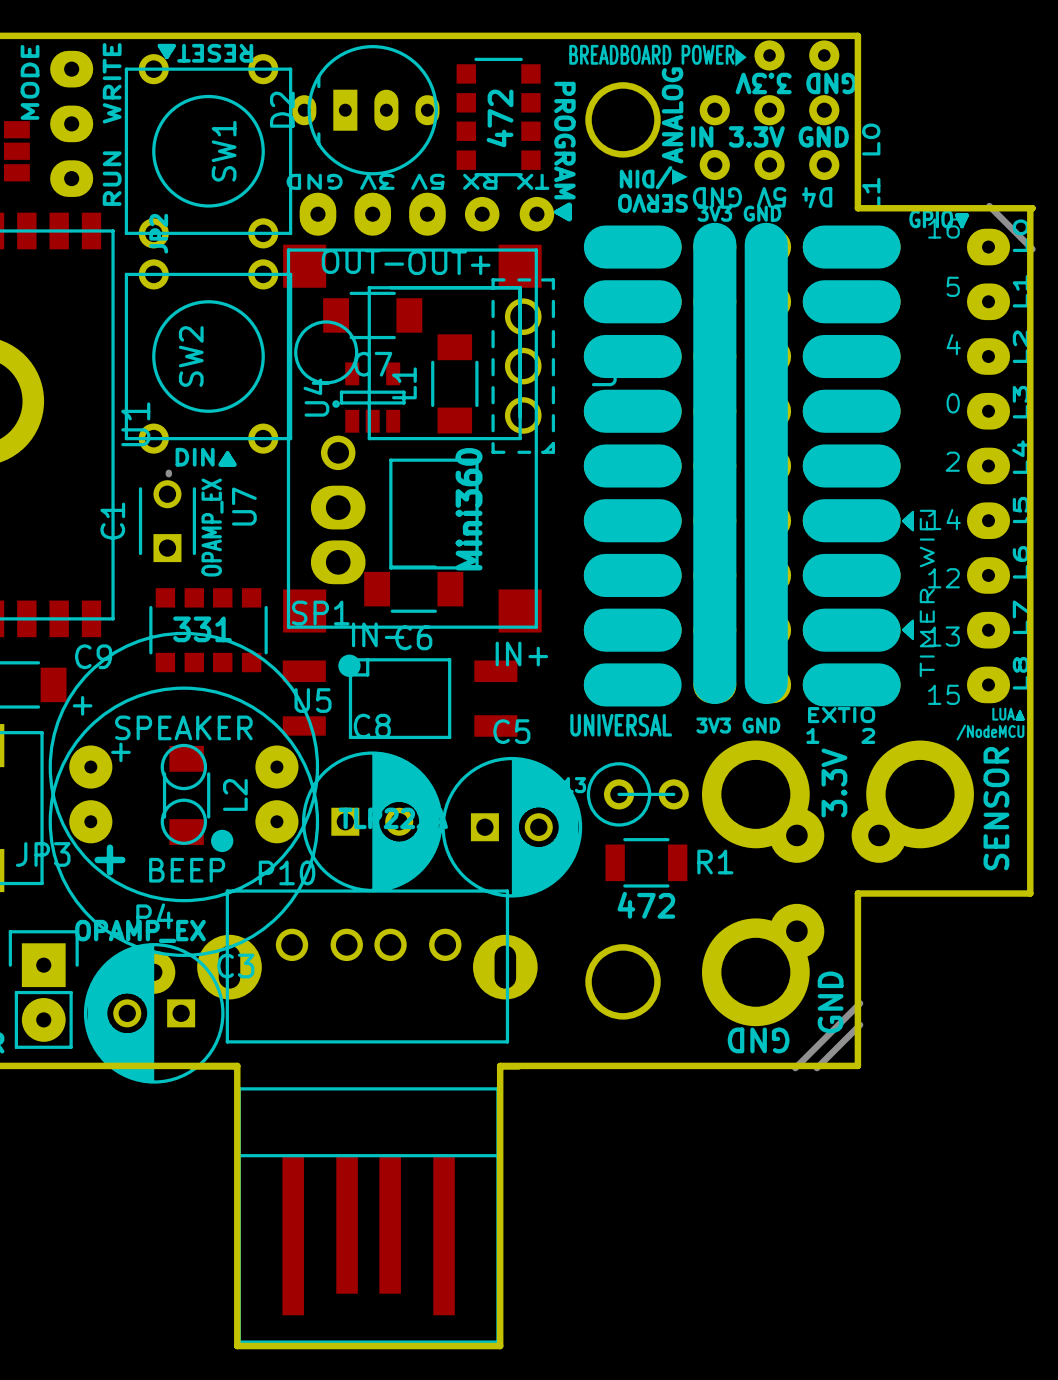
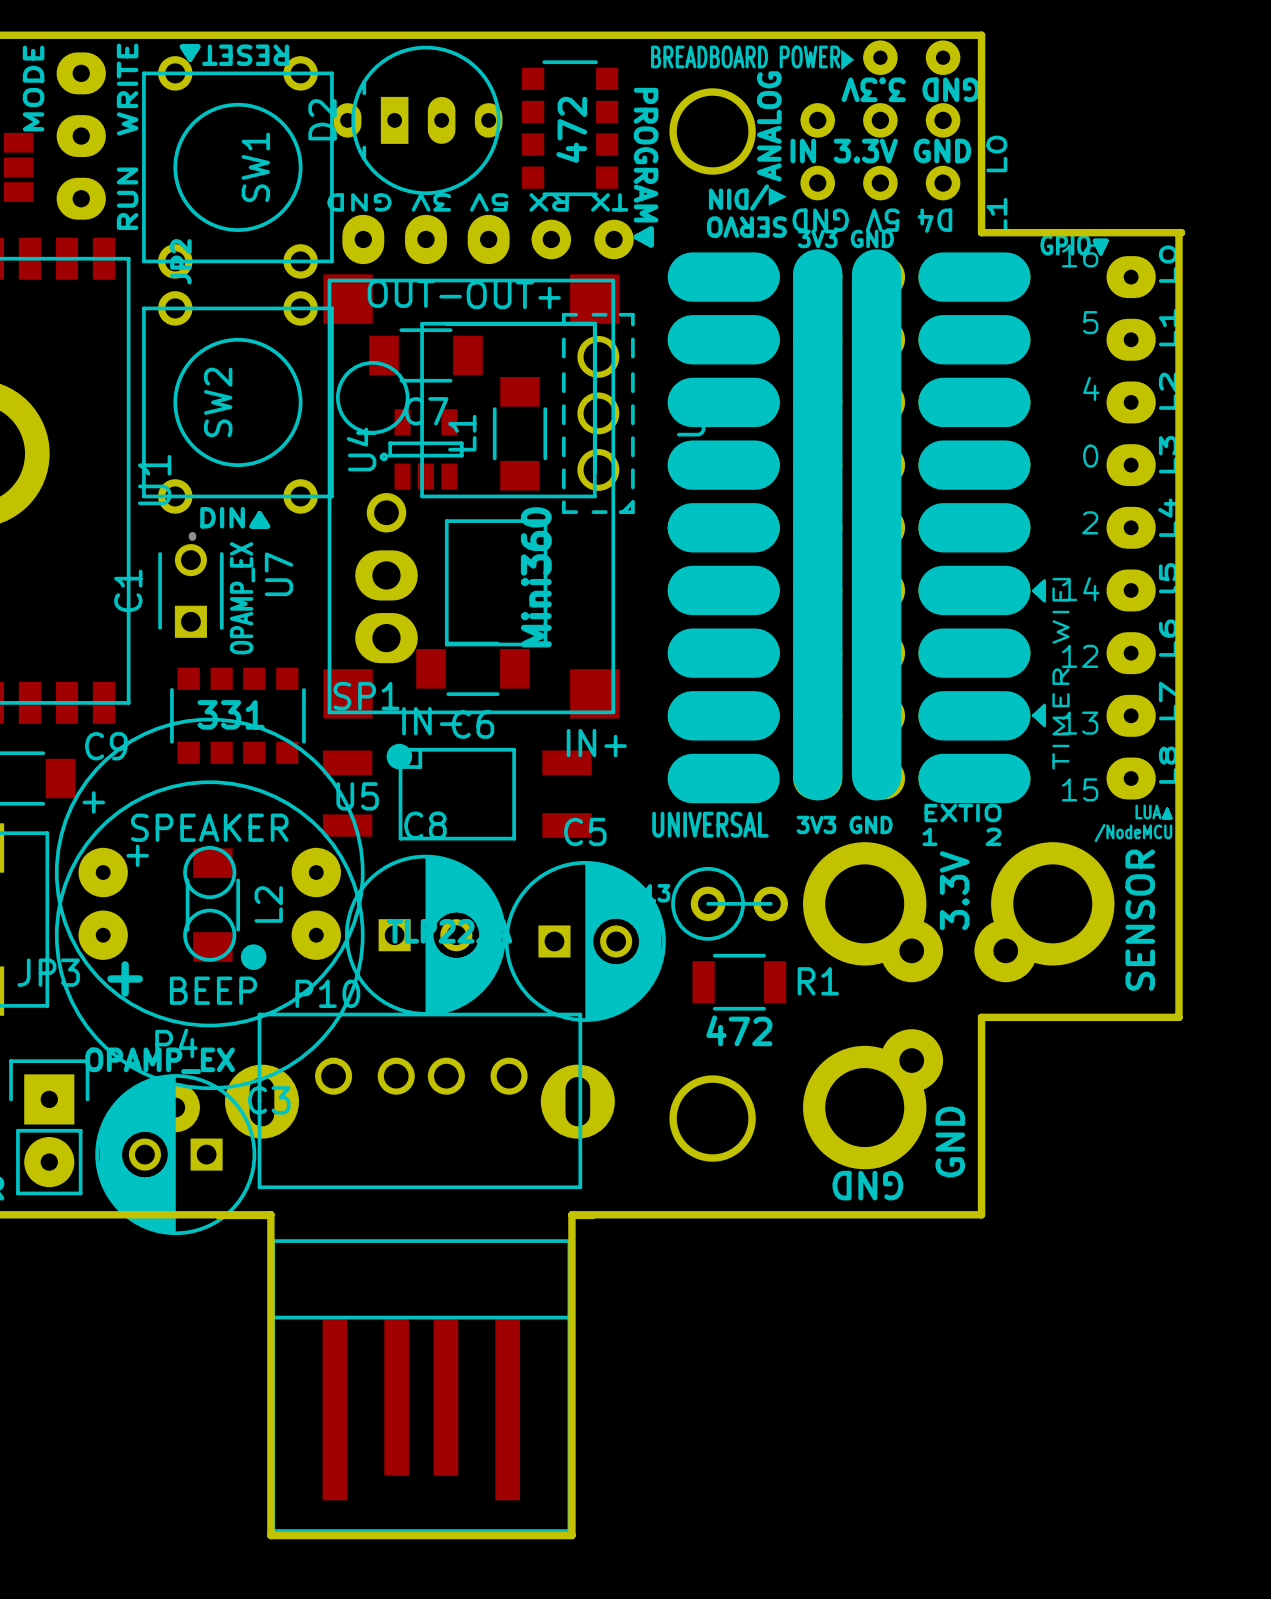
line: (989, 206) (1032, 249) -> none
line: (860, 1003) (795, 1068) -> none
line: (860, 1024) (816, 1068) -> none

